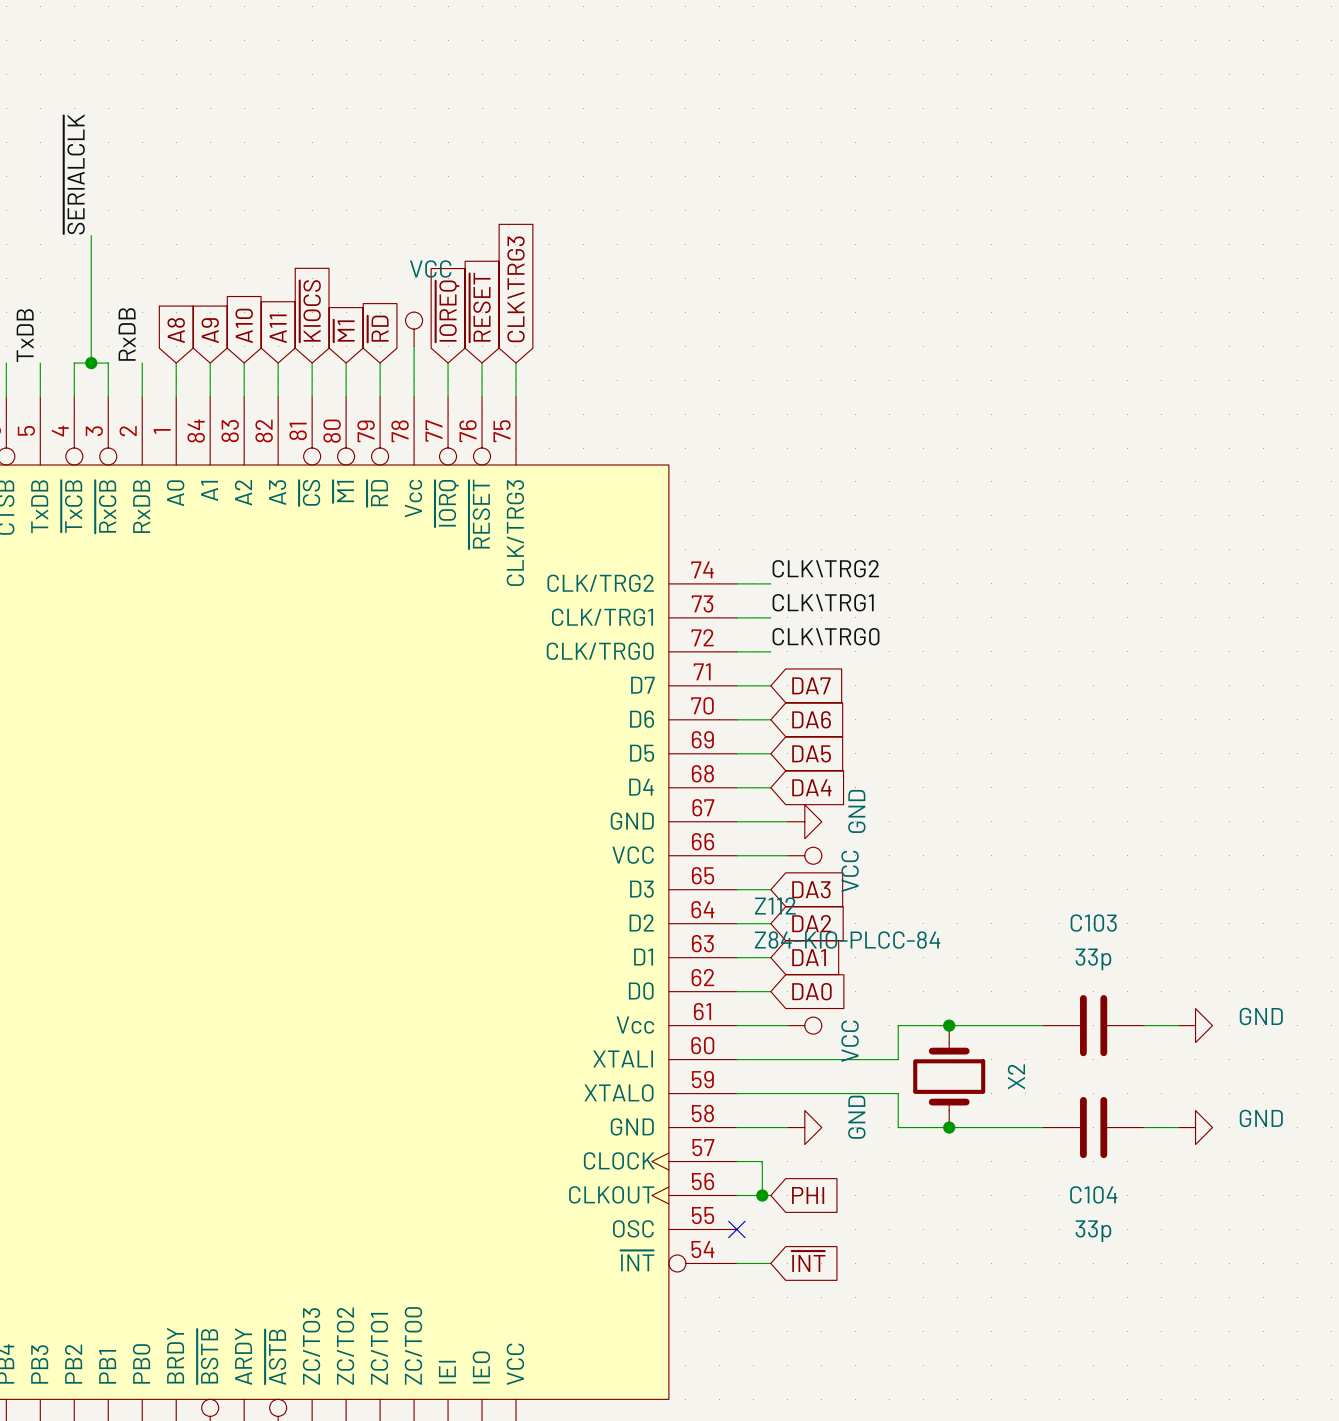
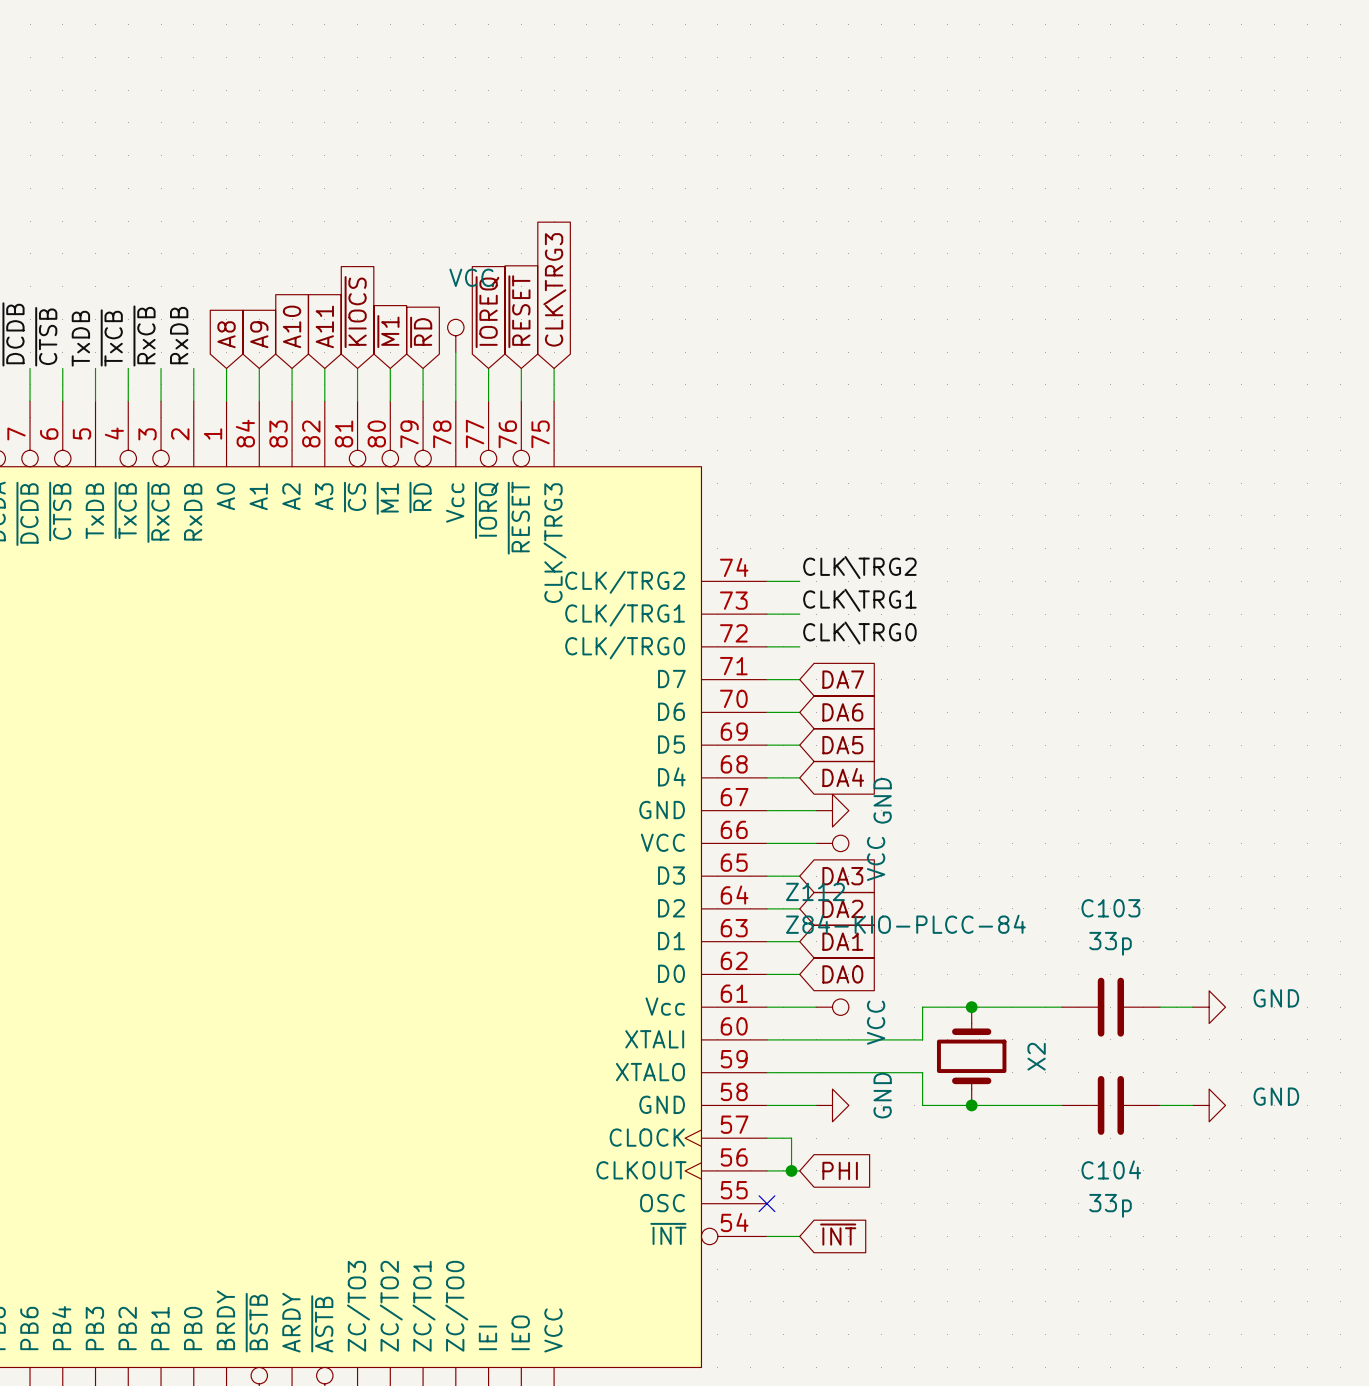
label: ~{SERIALCLK} (74, 174) -> none
wire: (91, 235) (91, 363) -> none
label: none -> ~{RxCB} (144, 335)
label: none -> ~{TxCB} (111, 337)
wire: (74, 363) (108, 363) -> none
junction: (91, 363) -> none

